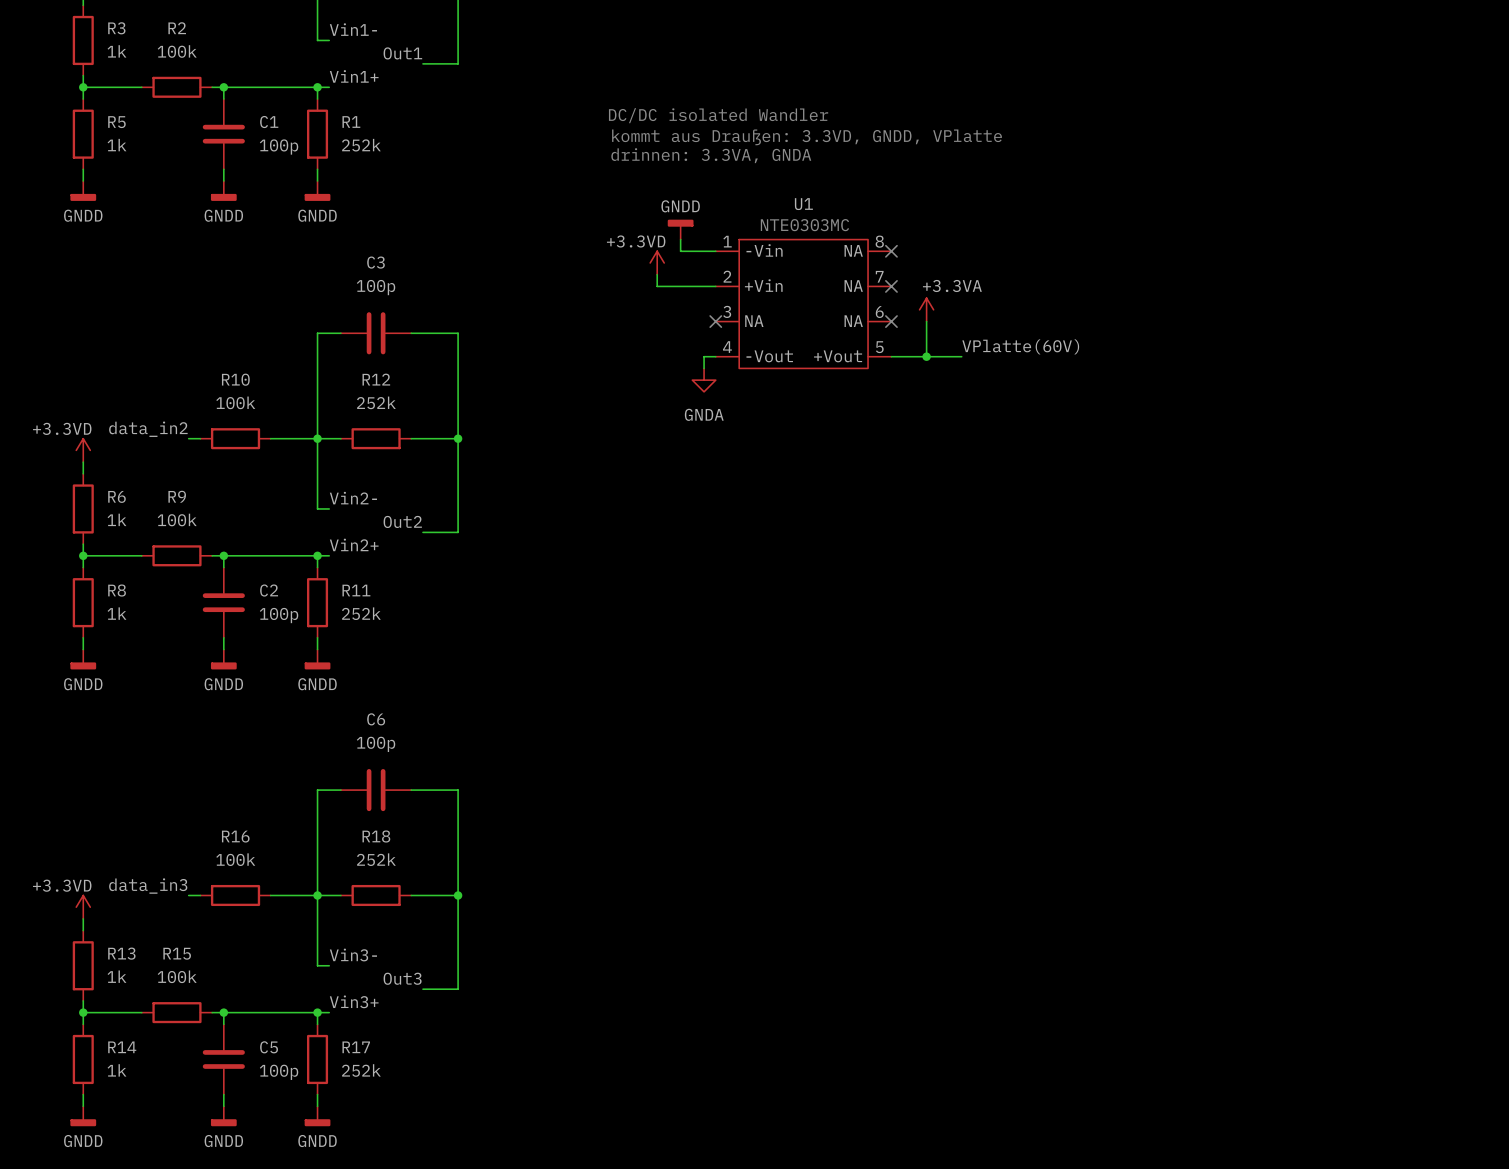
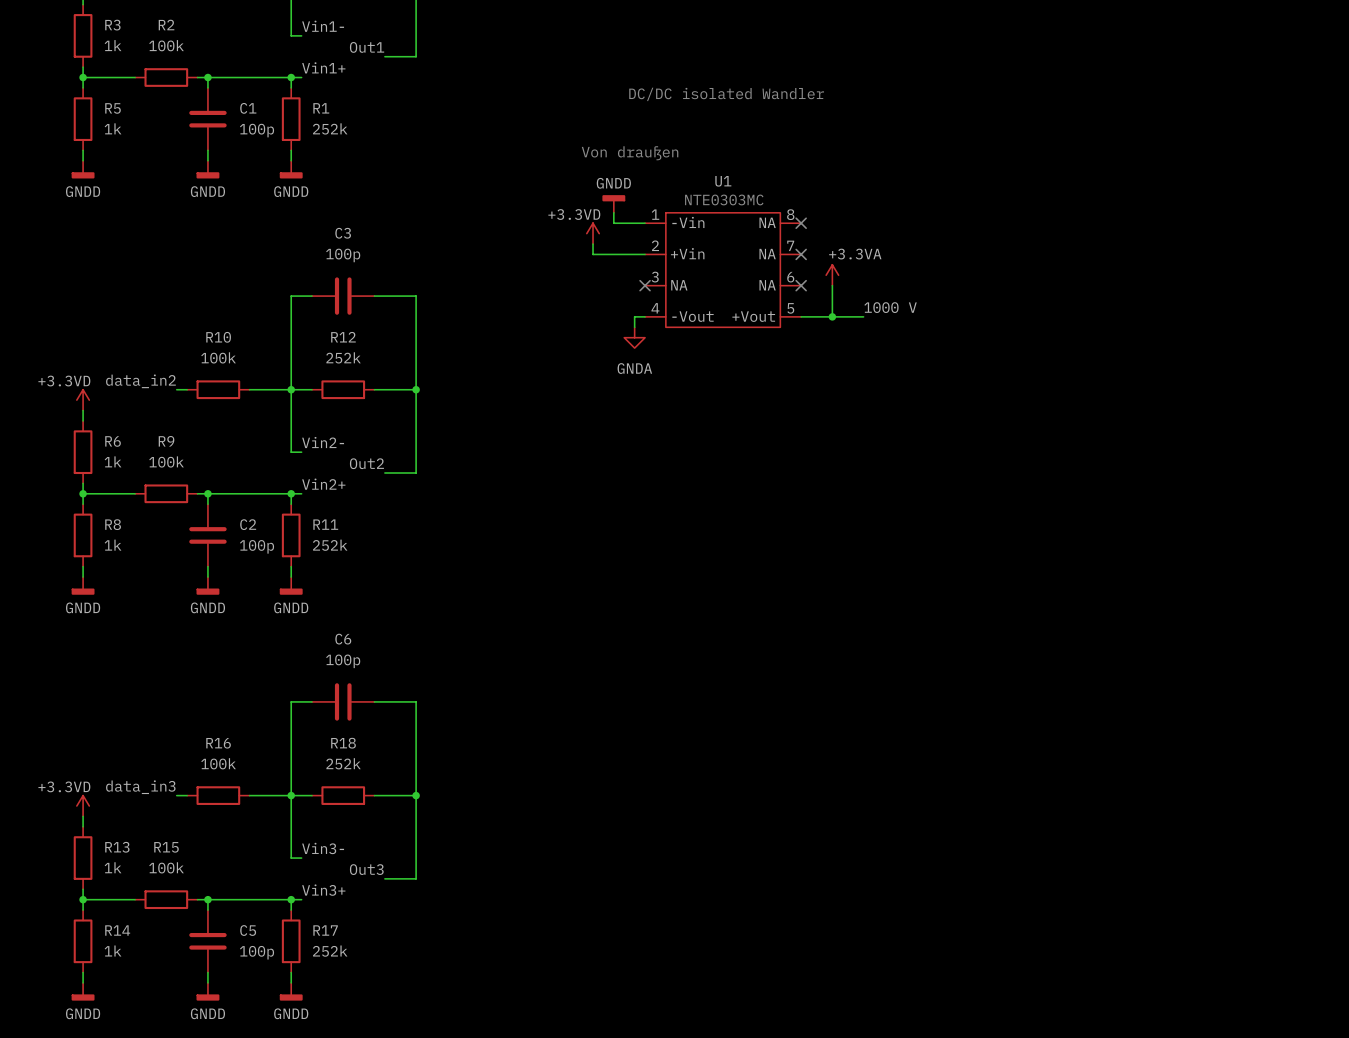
text position: DC/DC isolated Wandler (718, 115) -> DC/DC isolated Wandler (726, 94)
text: kommt aus Draußen: 3.3VD, GNDD, VPlatte (807, 137) -> none
text: drinnen: 3.3VA, GNDA (711, 155) -> none
text: none -> Von draußen (630, 153)
label: VPlatte(60V) (1020, 346) -> 1000 V (890, 307)

